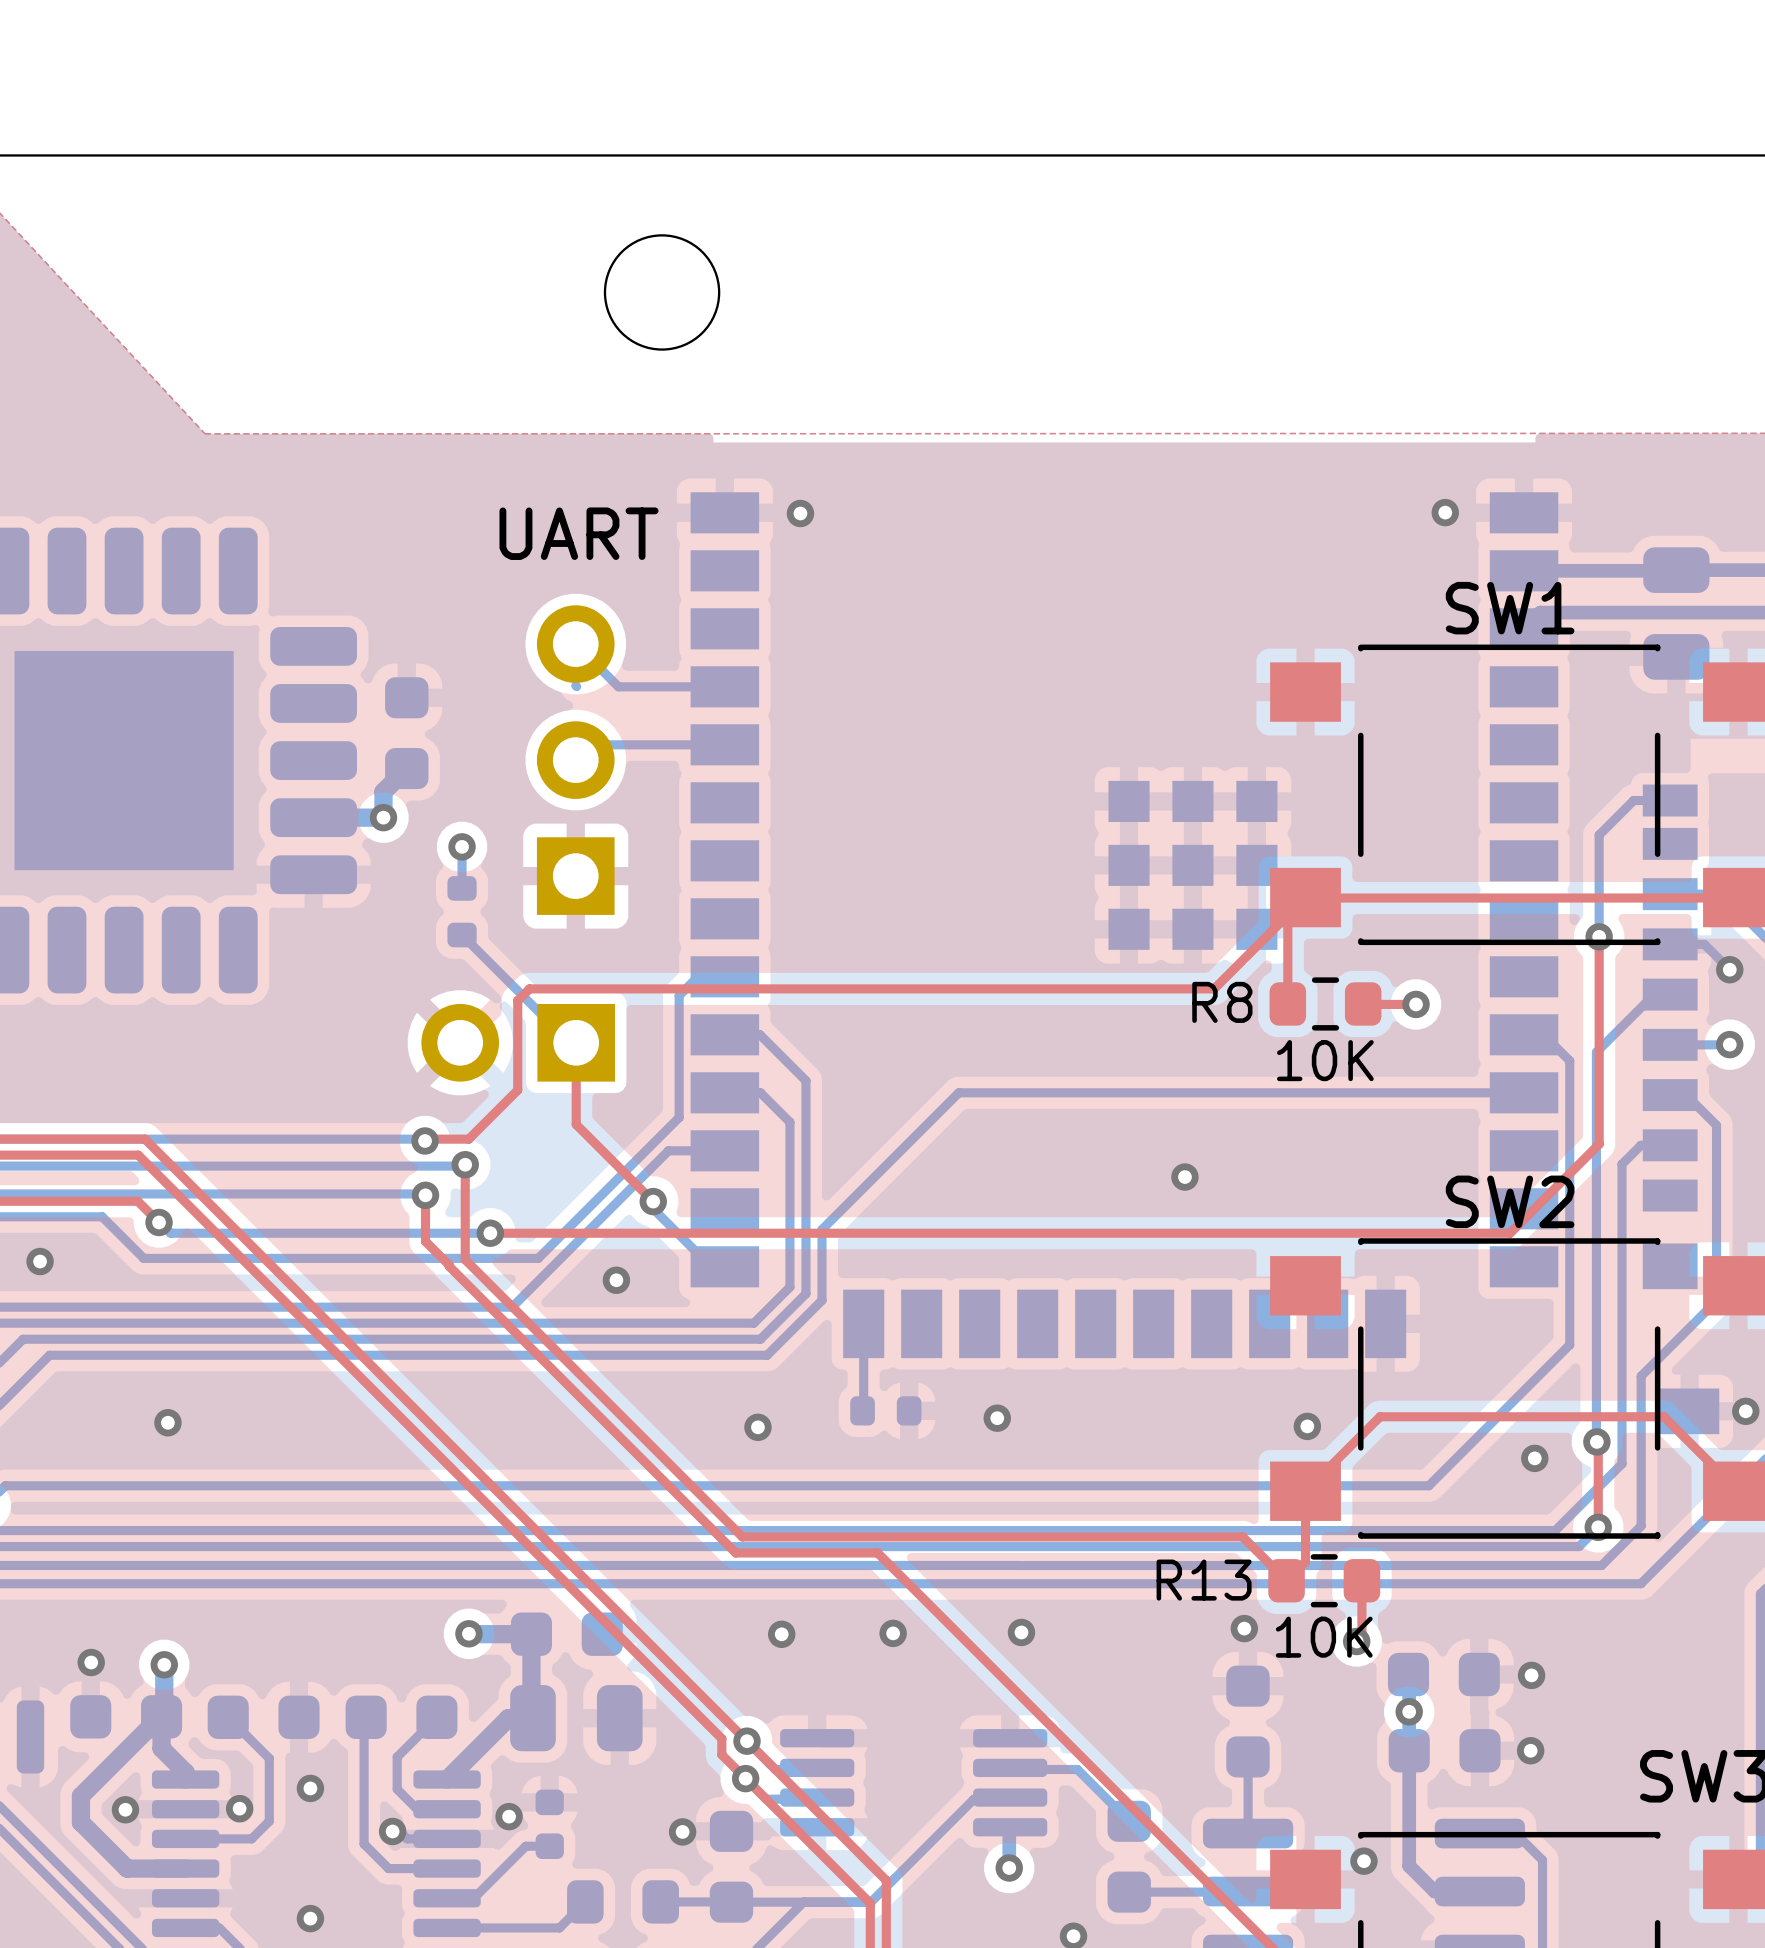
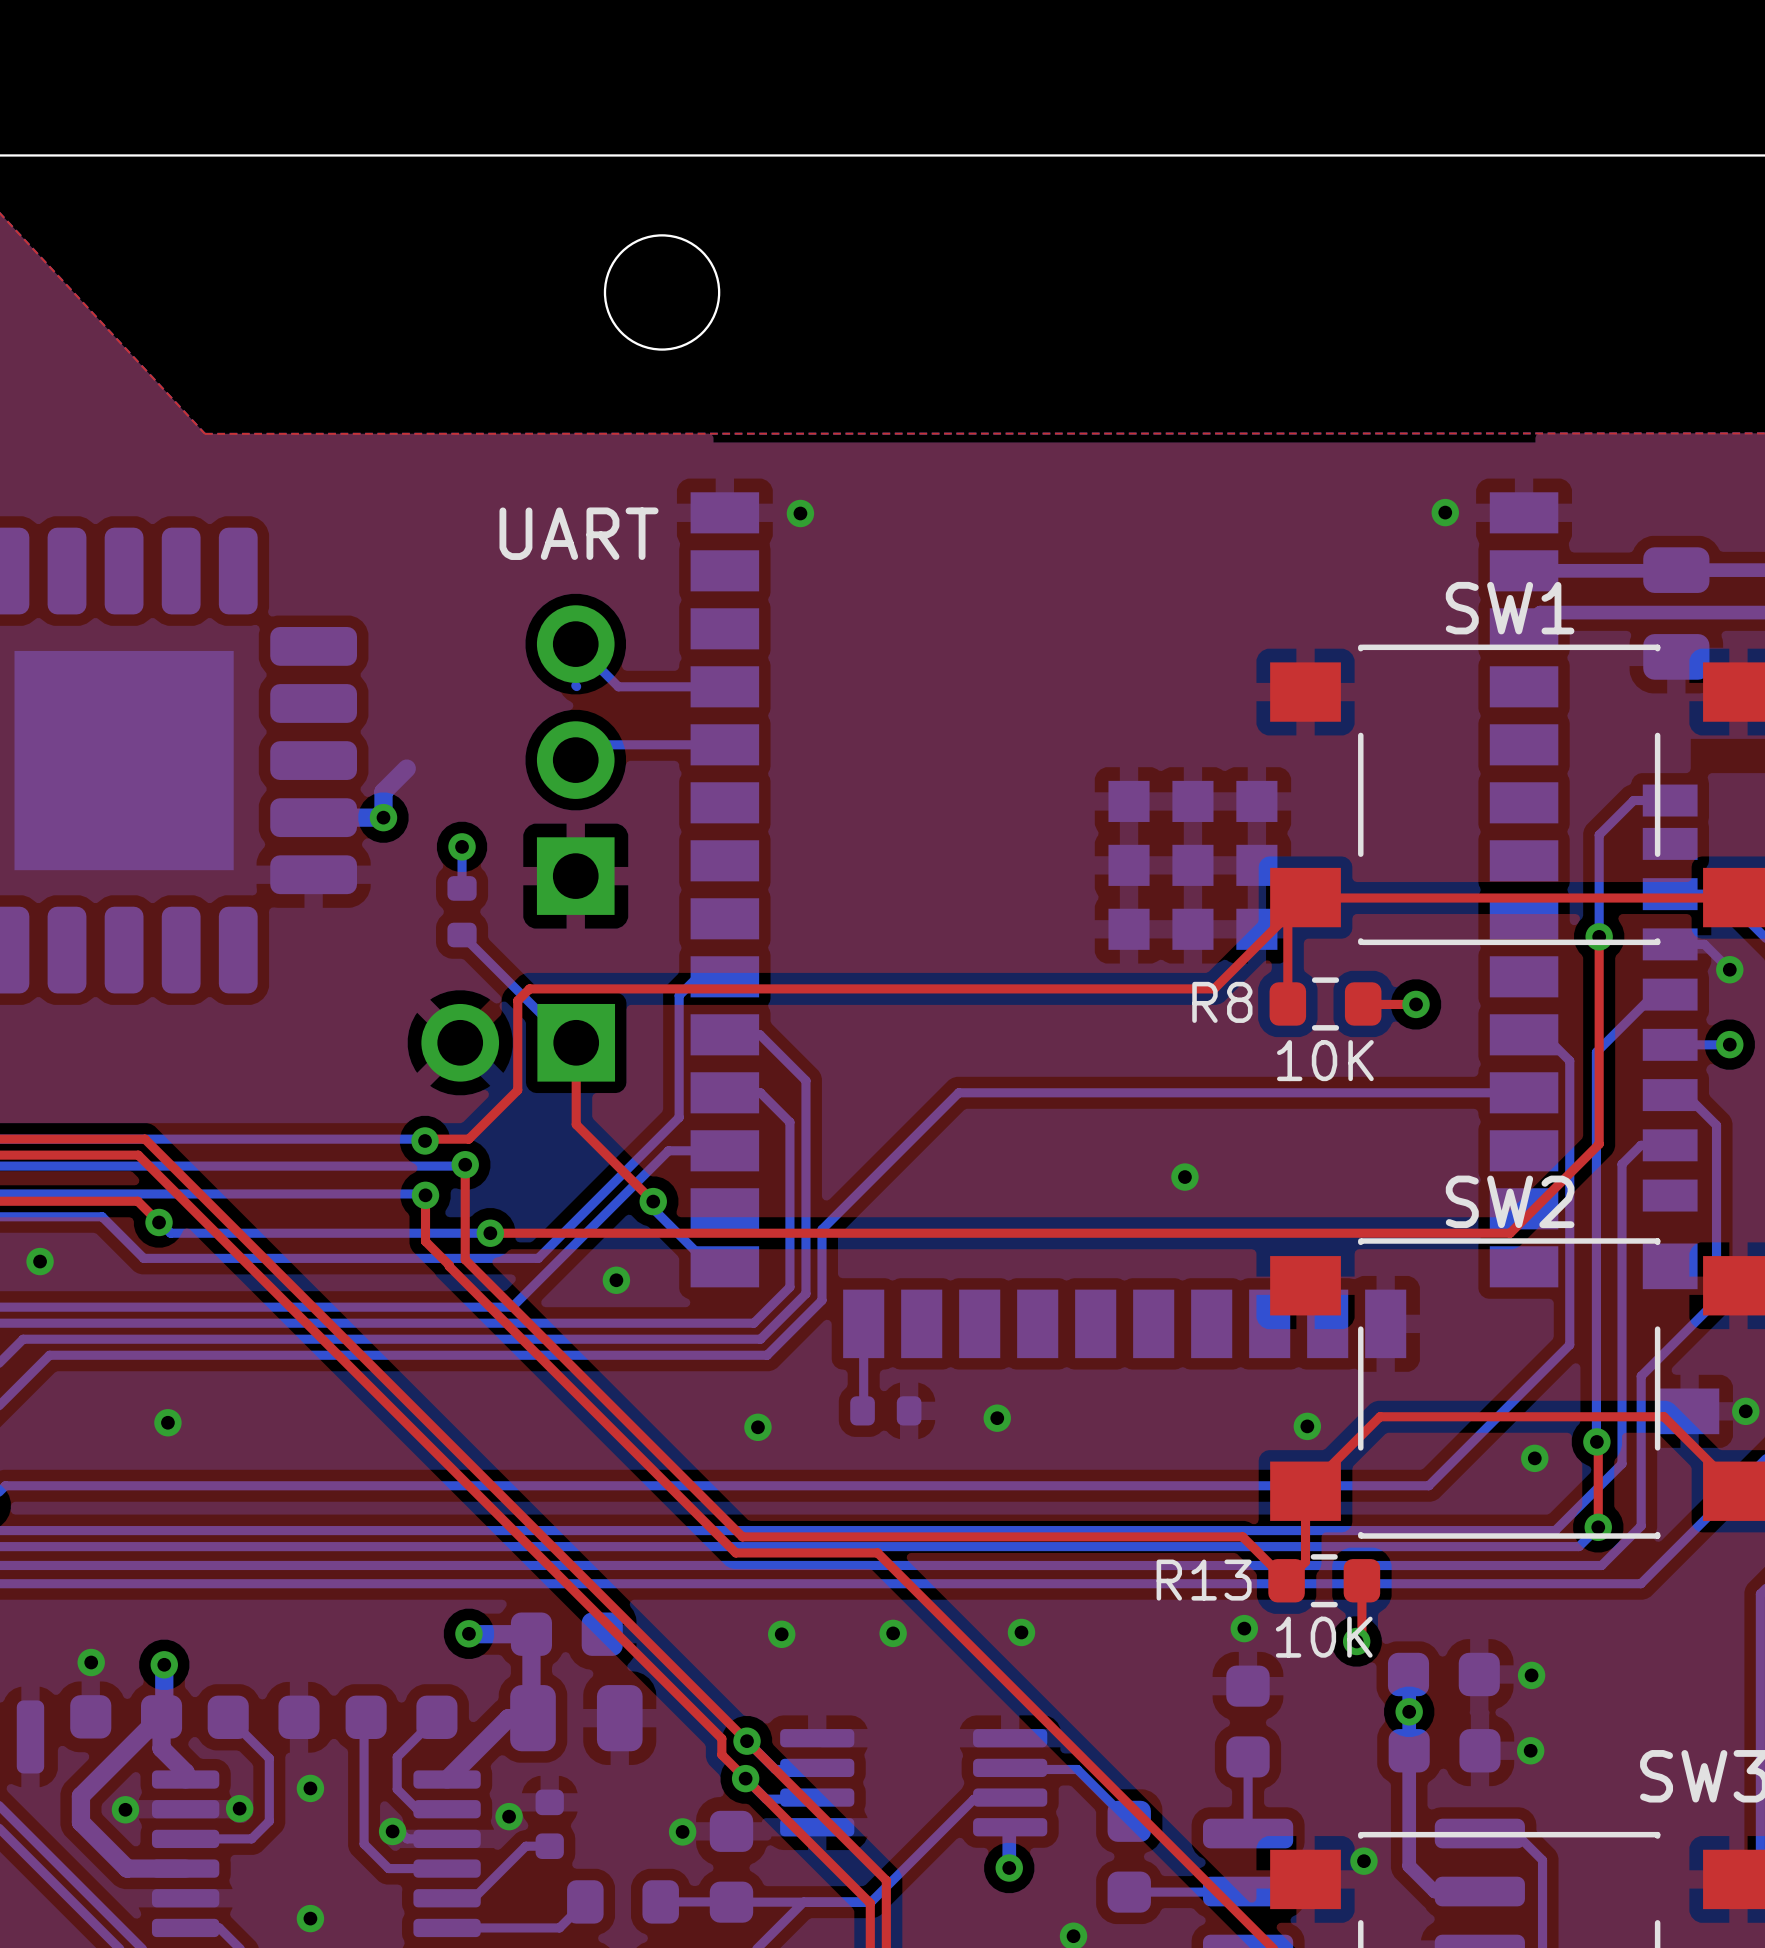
part: (406, 733) -> none

